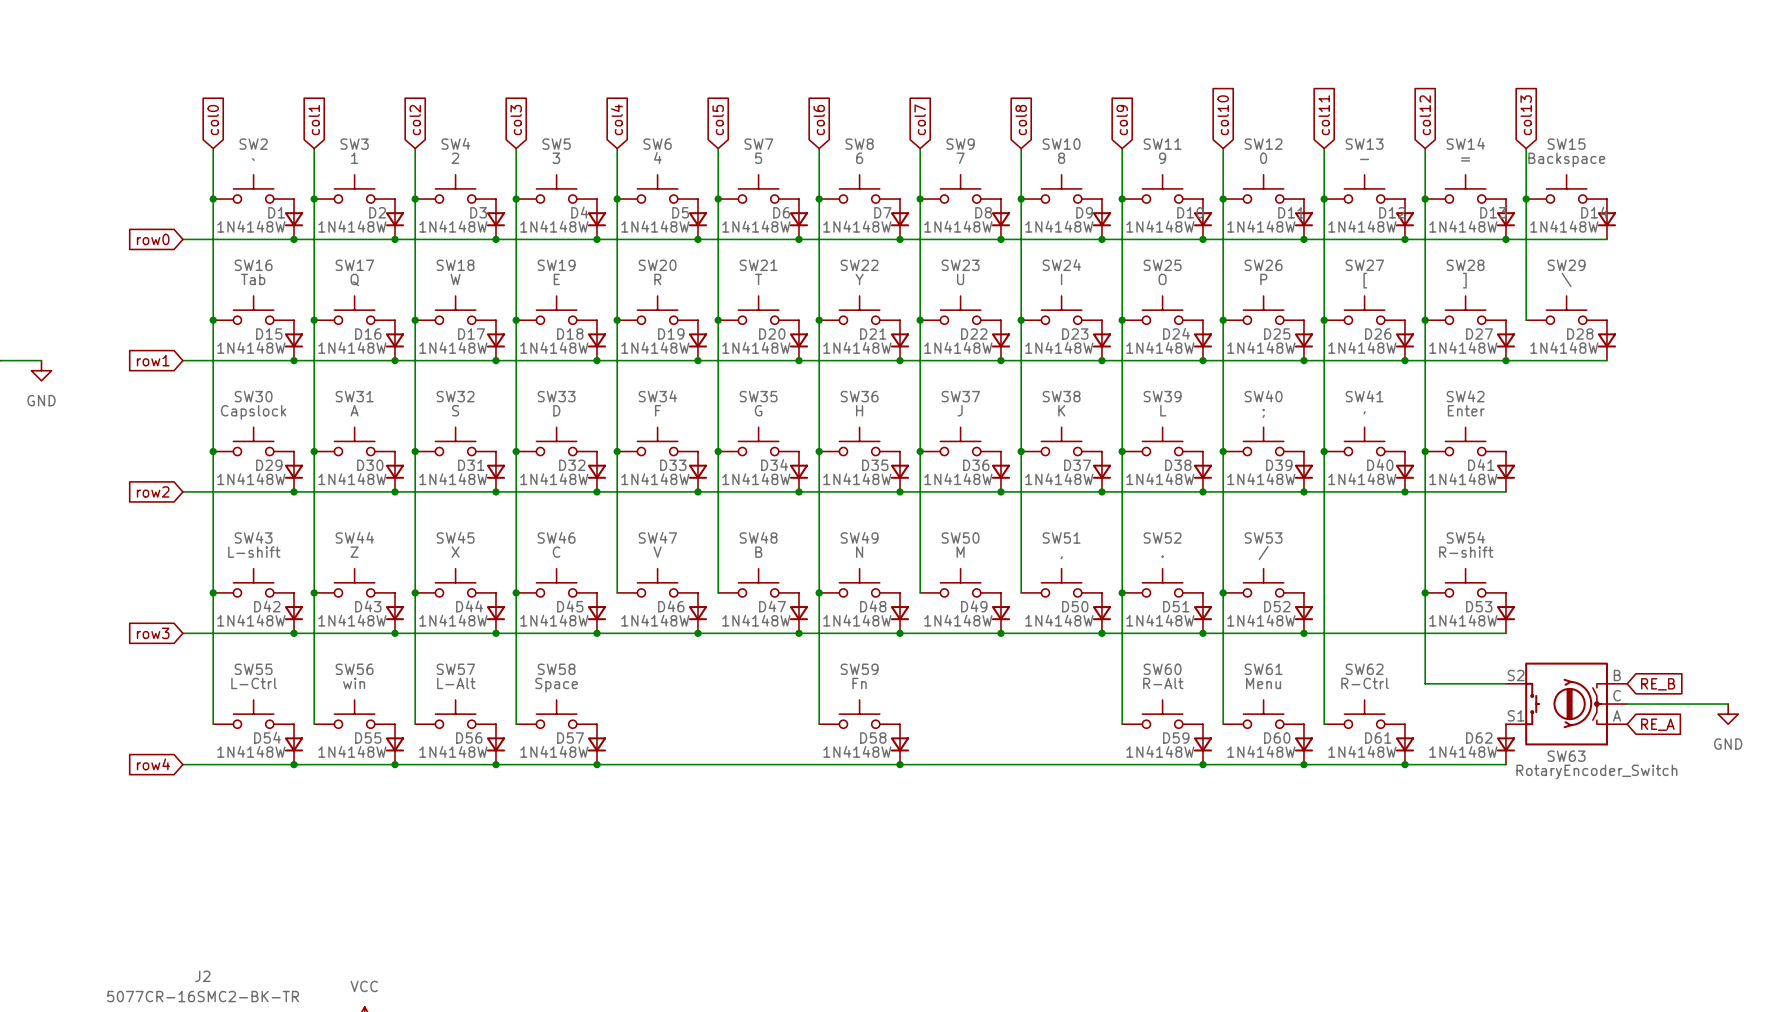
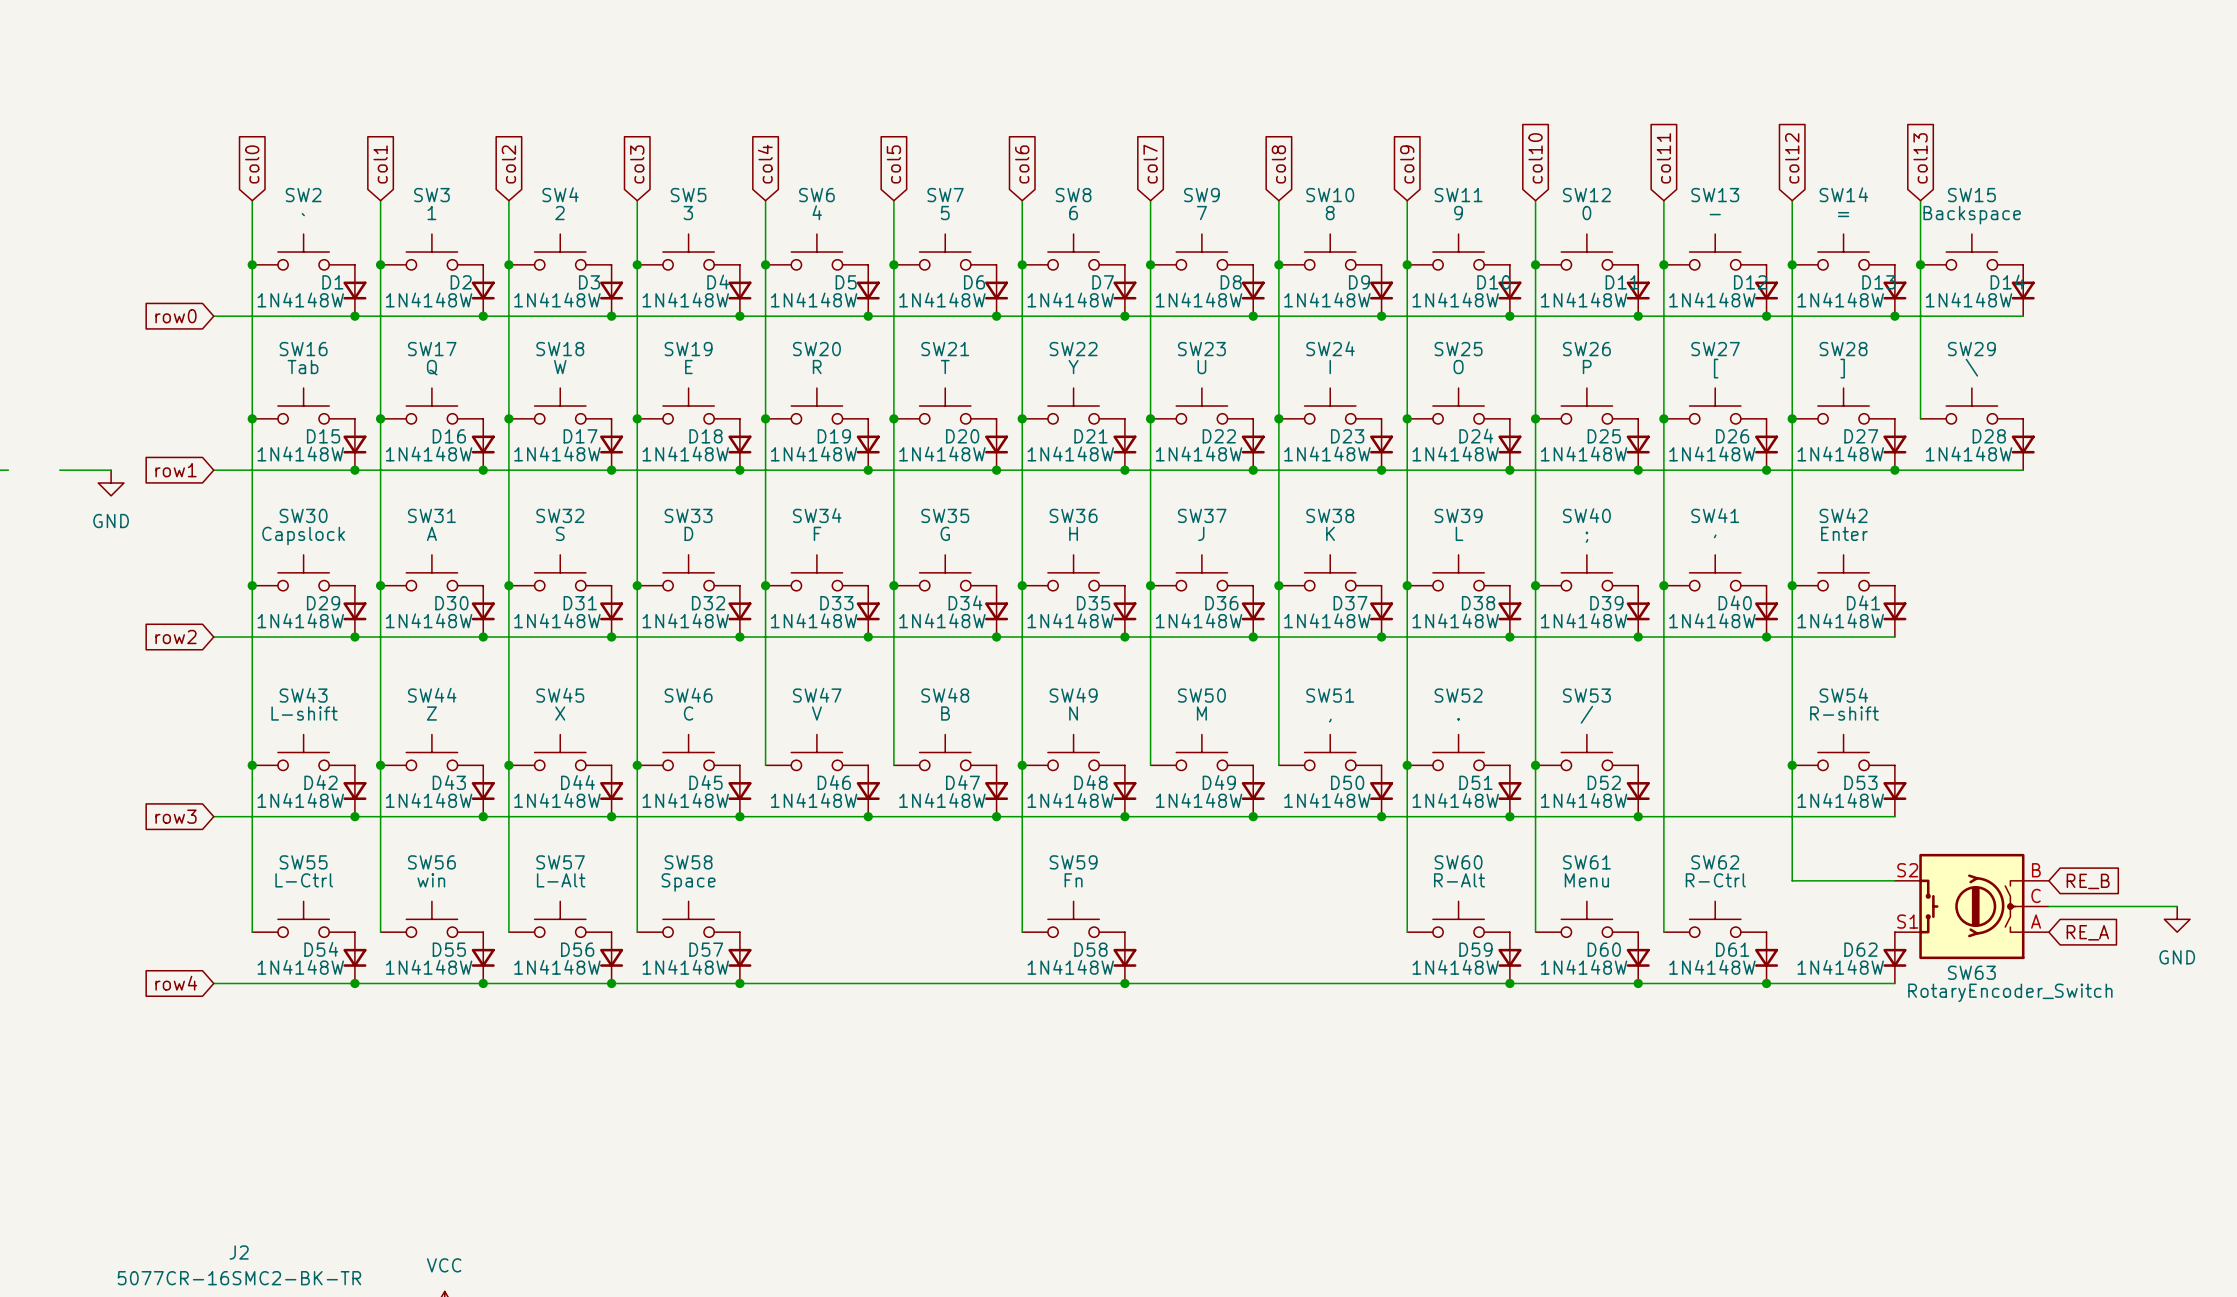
wire: (21, 360) (41, 360) -> none
wire: none -> (59, 470) (111, 470)
power symbol position: GND (41, 370) -> GND (111, 483)

